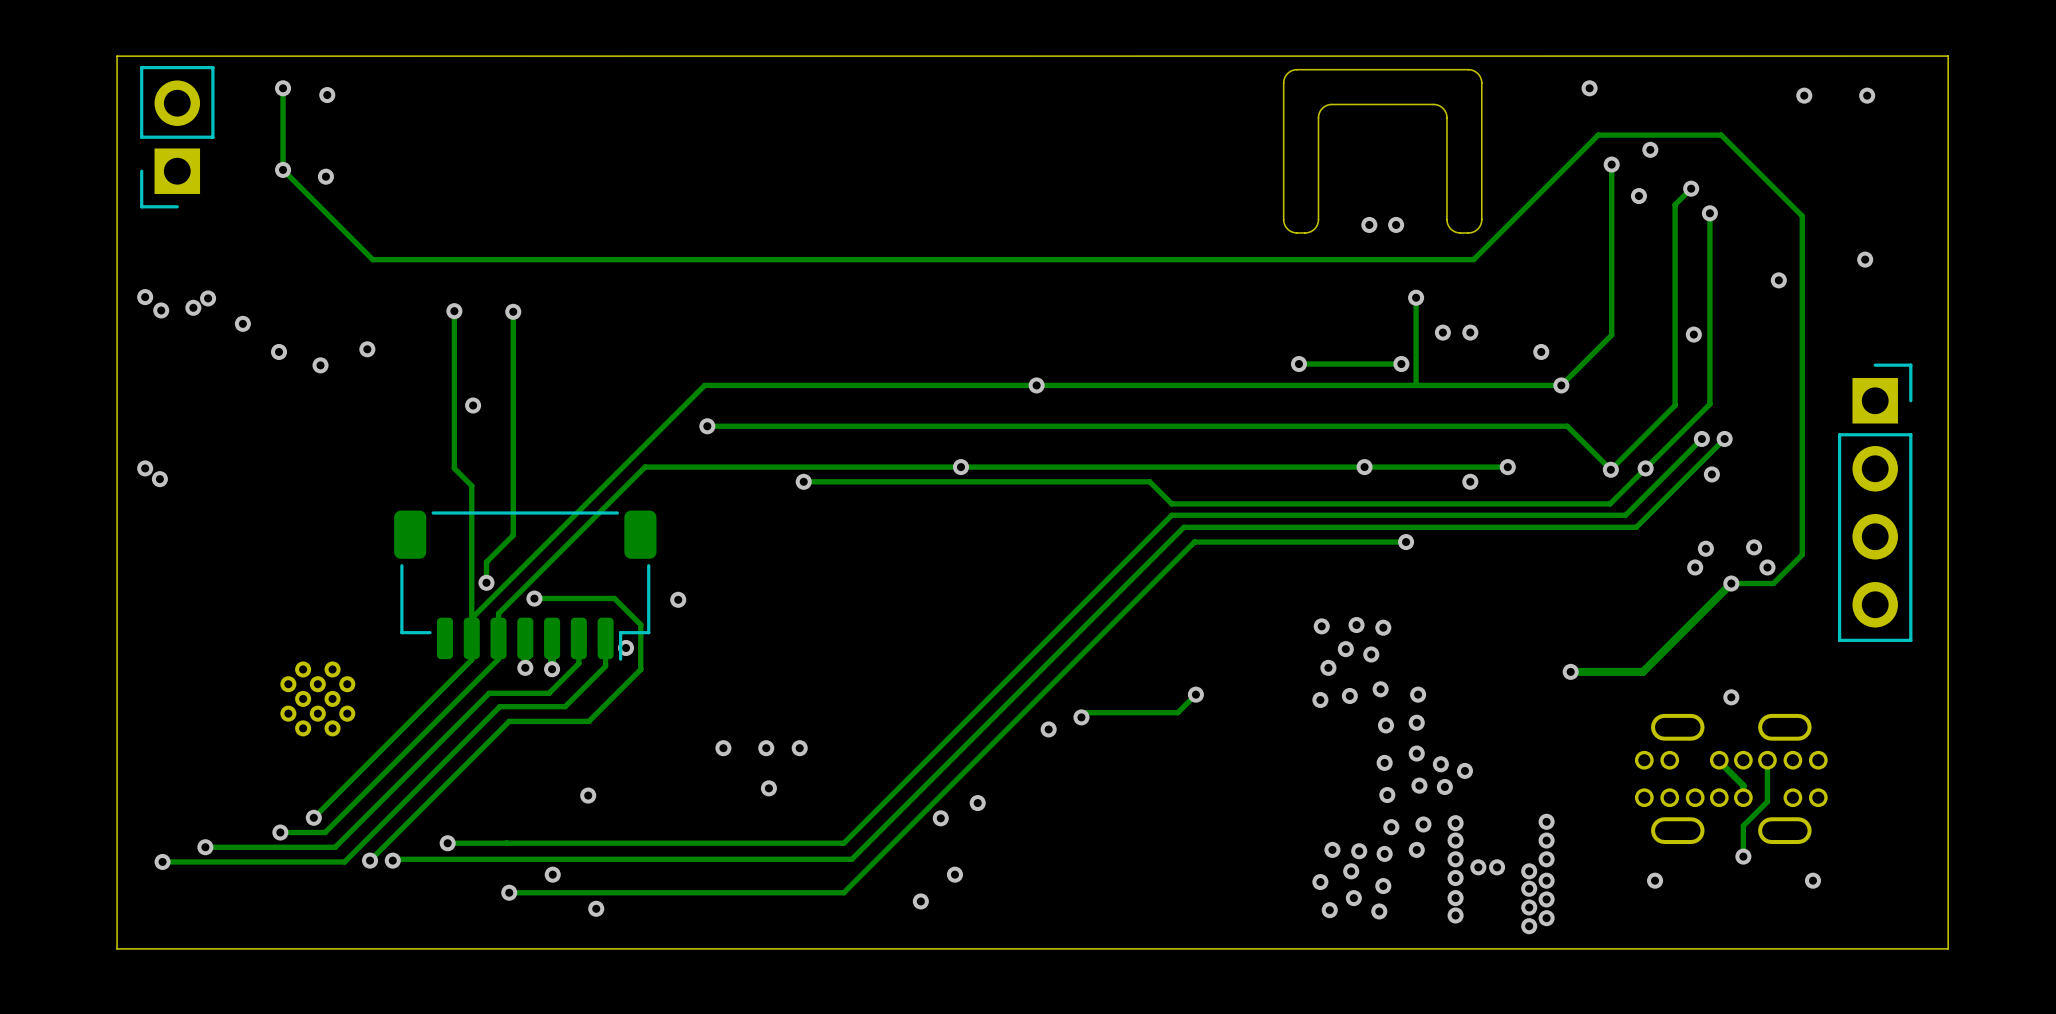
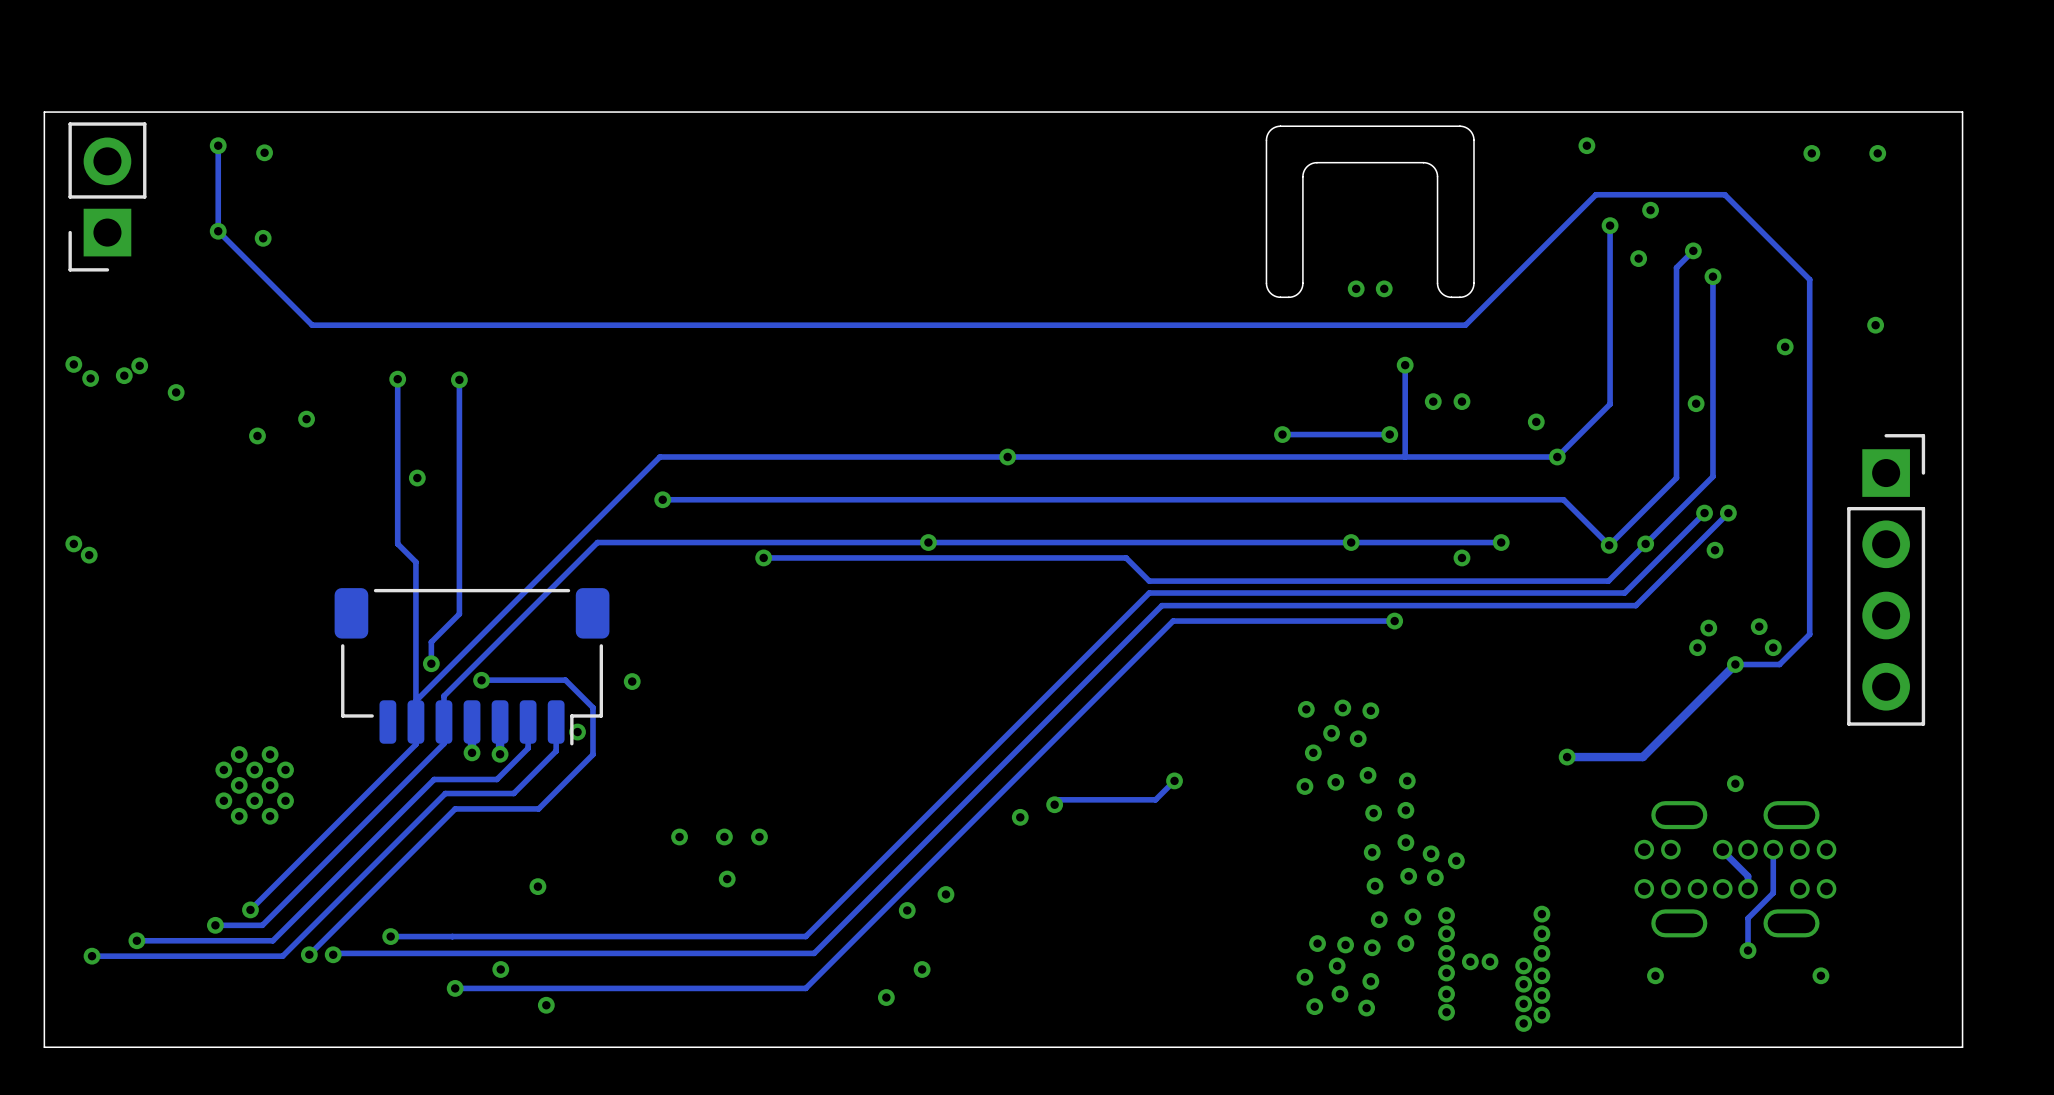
via: (279, 351) -> none

